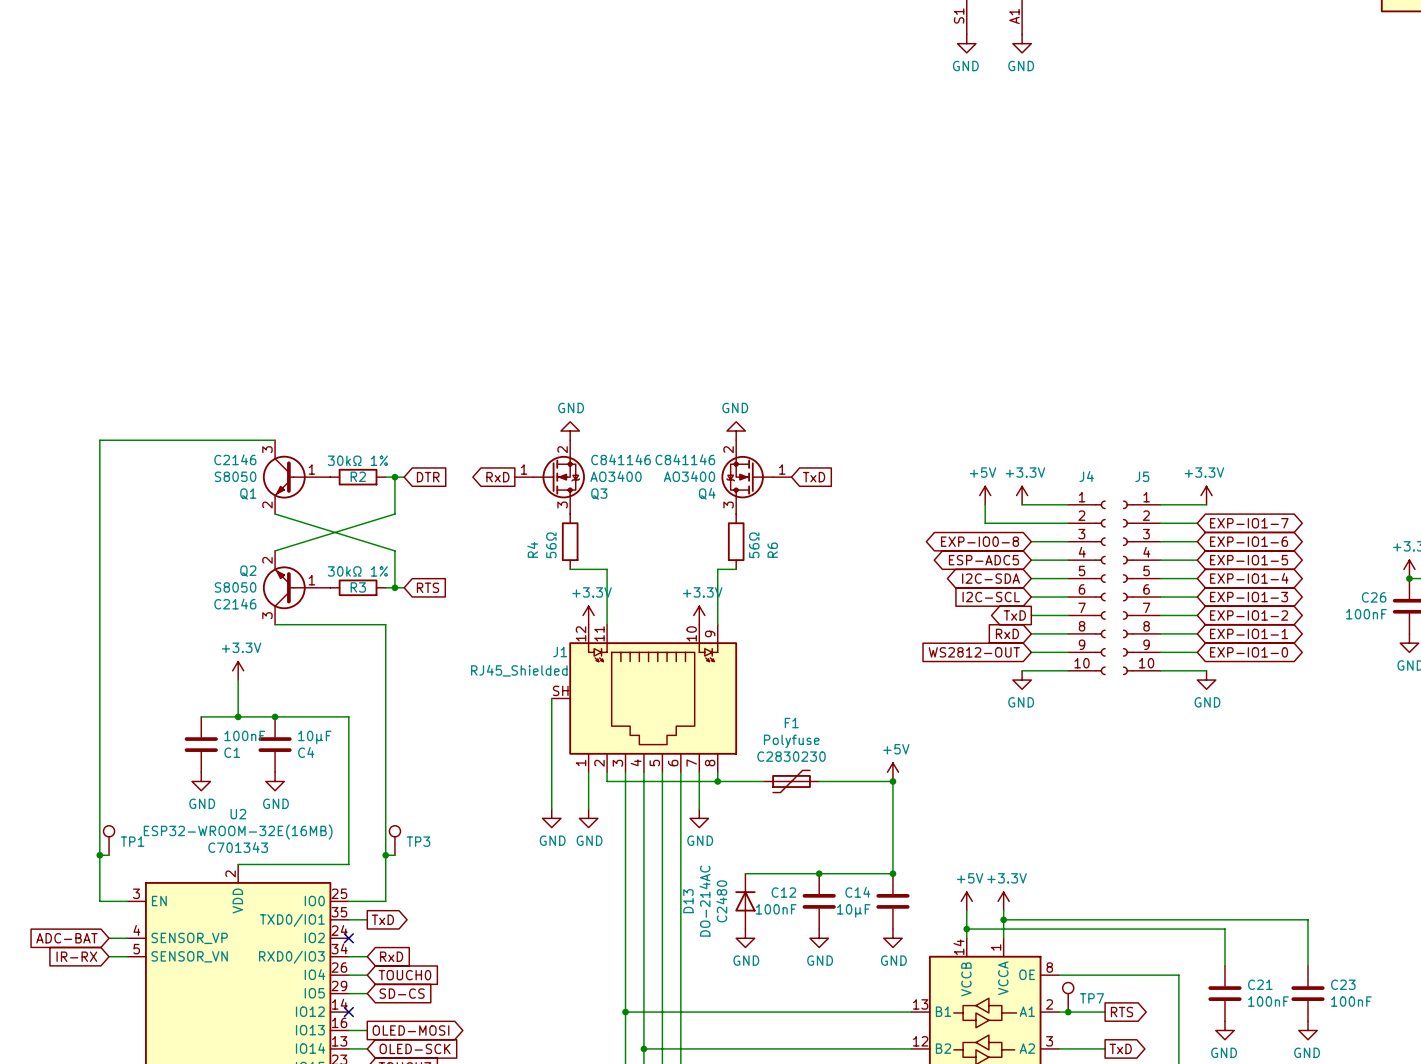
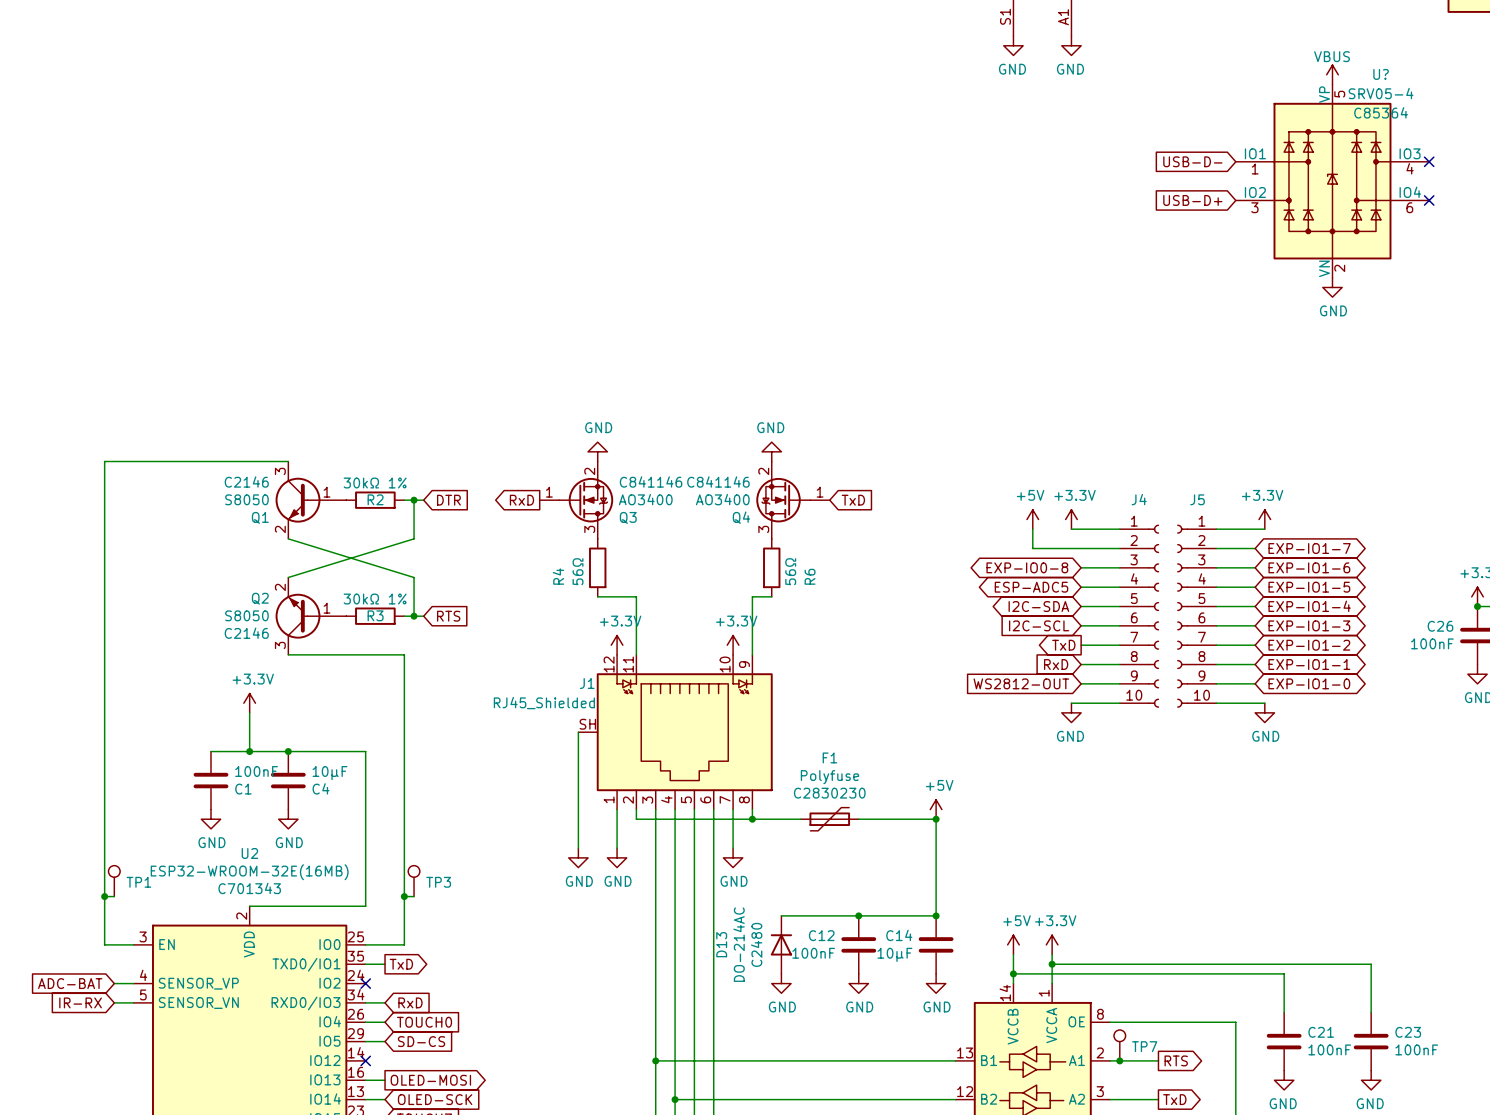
power symbol: none -> VBUS (1332, 74)
global label: none -> USB-D- (1192, 161)
no-connect mark: none -> (1429, 161)
U?: none -> SRV05-4 (1332, 181)
global label: none -> USB-D+ (1192, 200)
no-connect mark: none -> (1429, 200)
power symbol: none -> GND (1332, 287)

